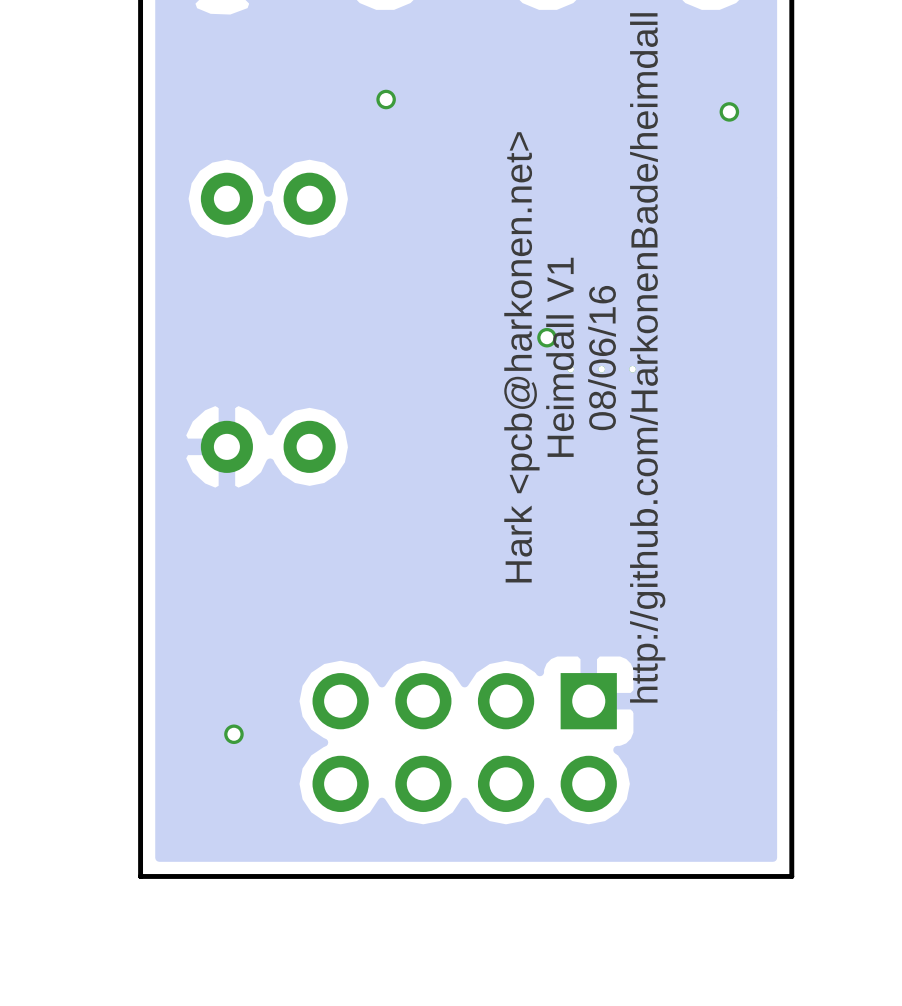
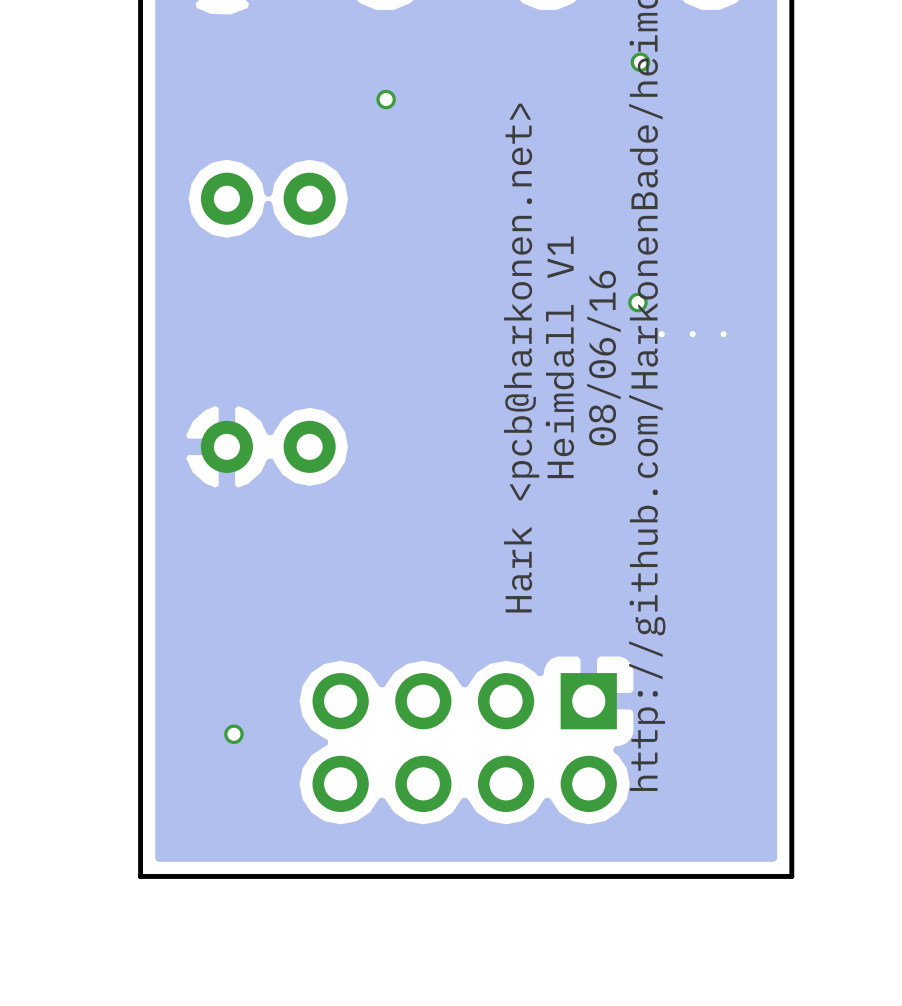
via position: (729, 111) -> (640, 62)
via position: (546, 337) -> (637, 302)
part position: (601, 369) -> (692, 334)

